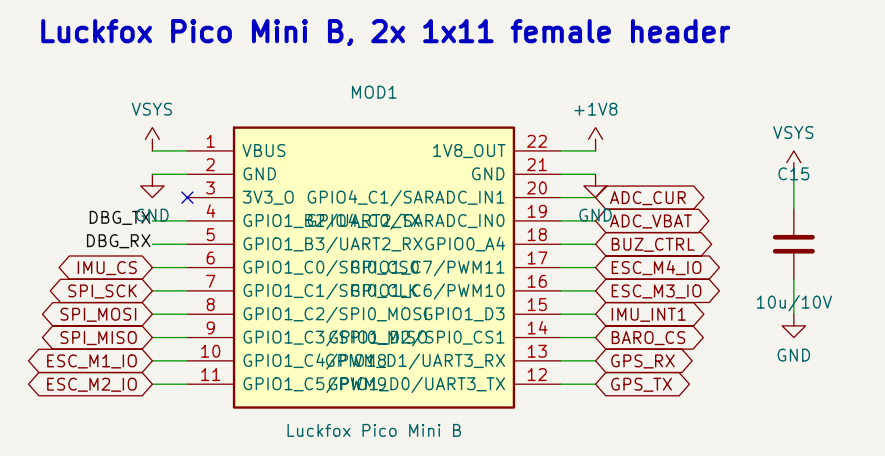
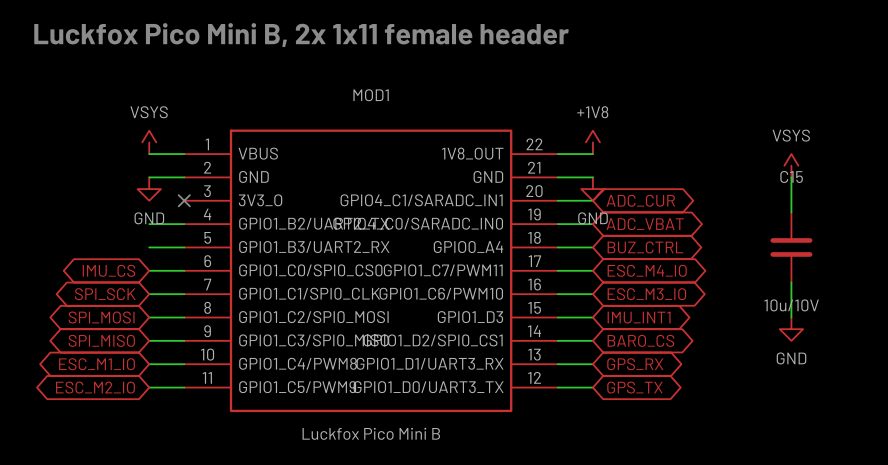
label: DBG_TX (120, 217) -> none
label: DBG_RX (118, 241) -> none

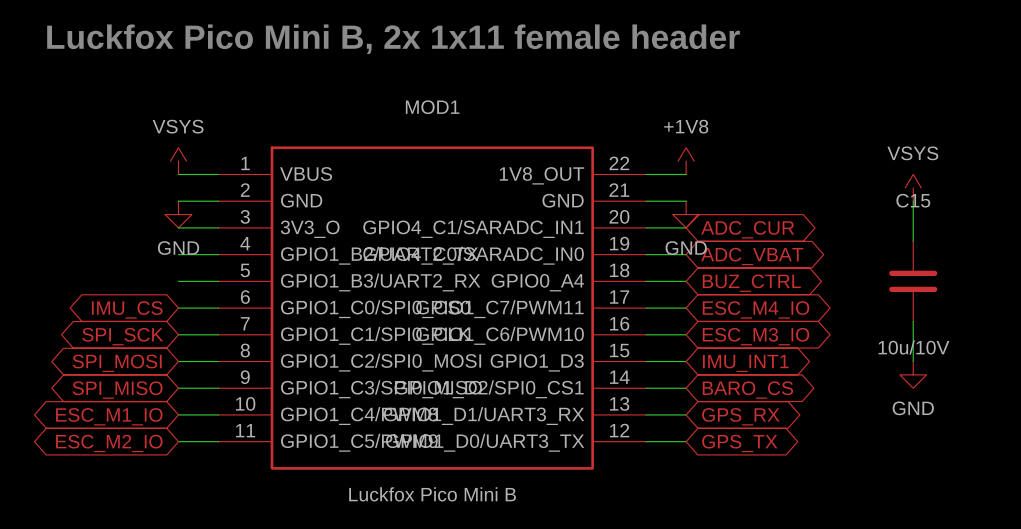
wire: none -> (178, 227) (218, 227)
no-connect mark: (184, 200) -> none

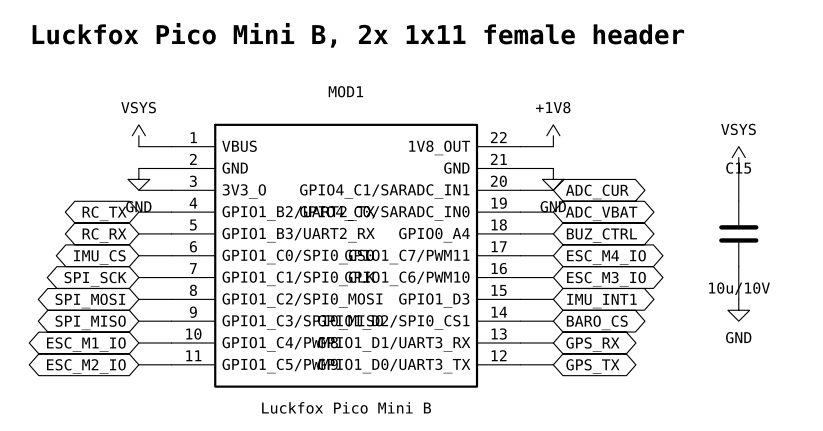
global label: none -> RC_TX (104, 213)
global label: none -> RC_RX (104, 235)

